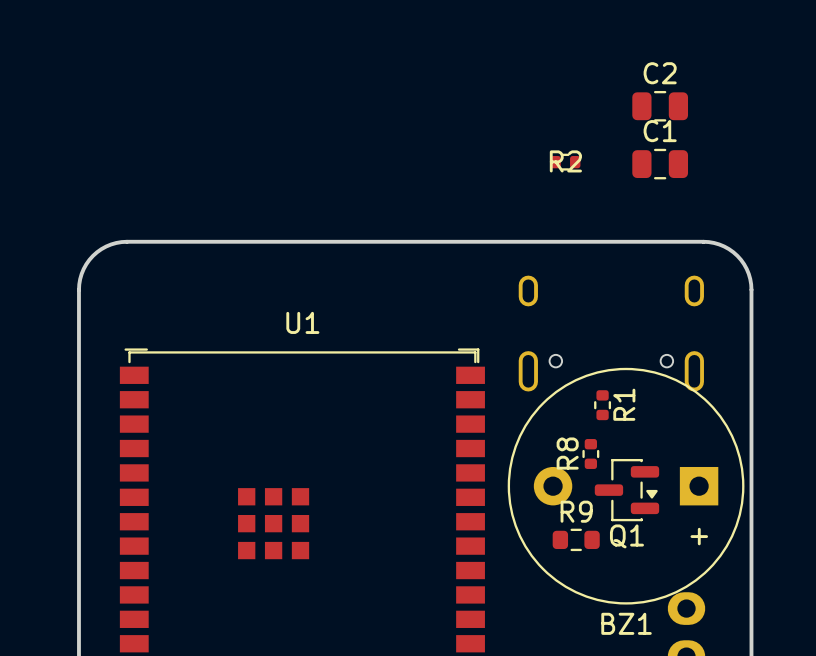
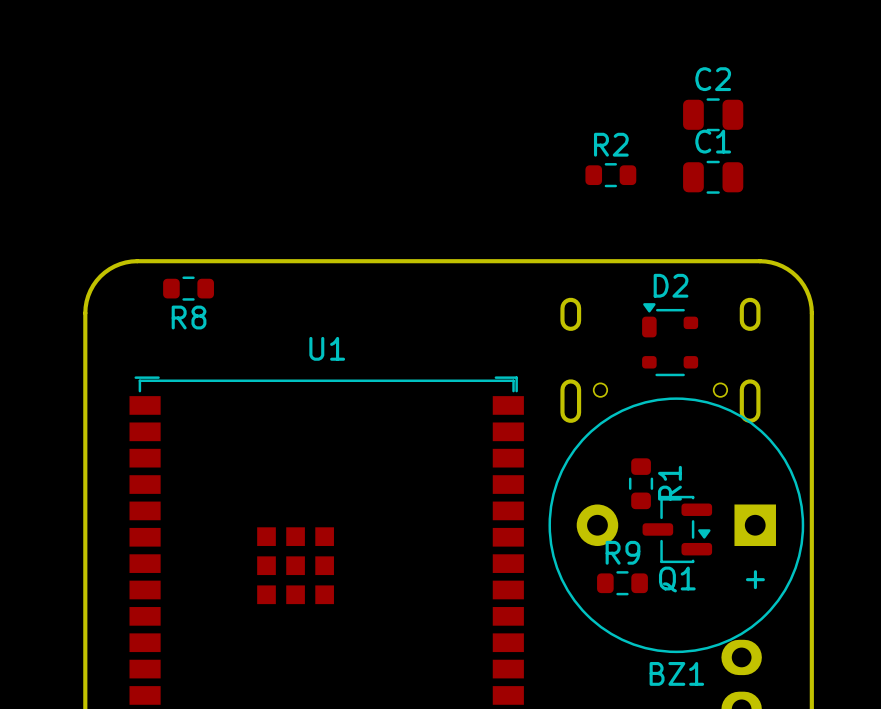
R2 footprint: [550, 153, 581, 171] -> [585, 163, 637, 188]
R2 name position: R2 (565, 161) -> R2 (611, 144)
D2: none -> (670, 339)
R1 footprint: [594, 390, 612, 421] -> [628, 458, 654, 510]
R8 footprint: [582, 439, 600, 469] -> [163, 276, 214, 301]

